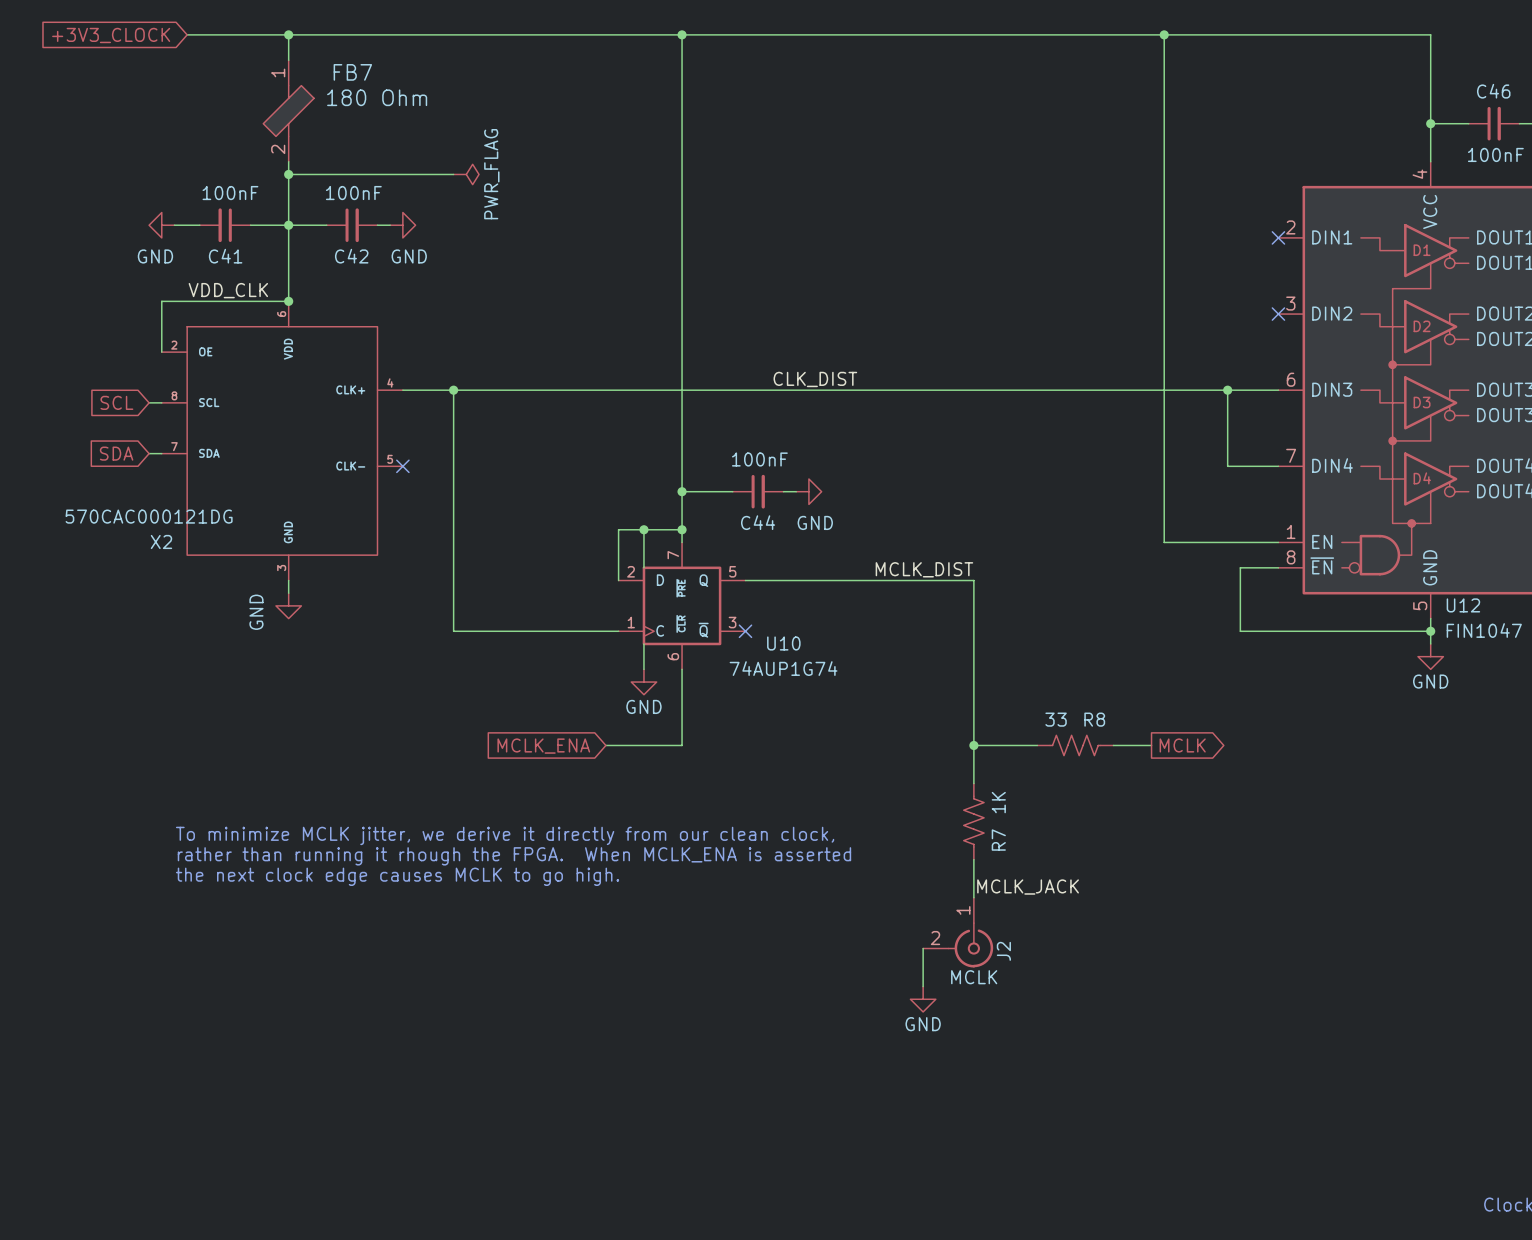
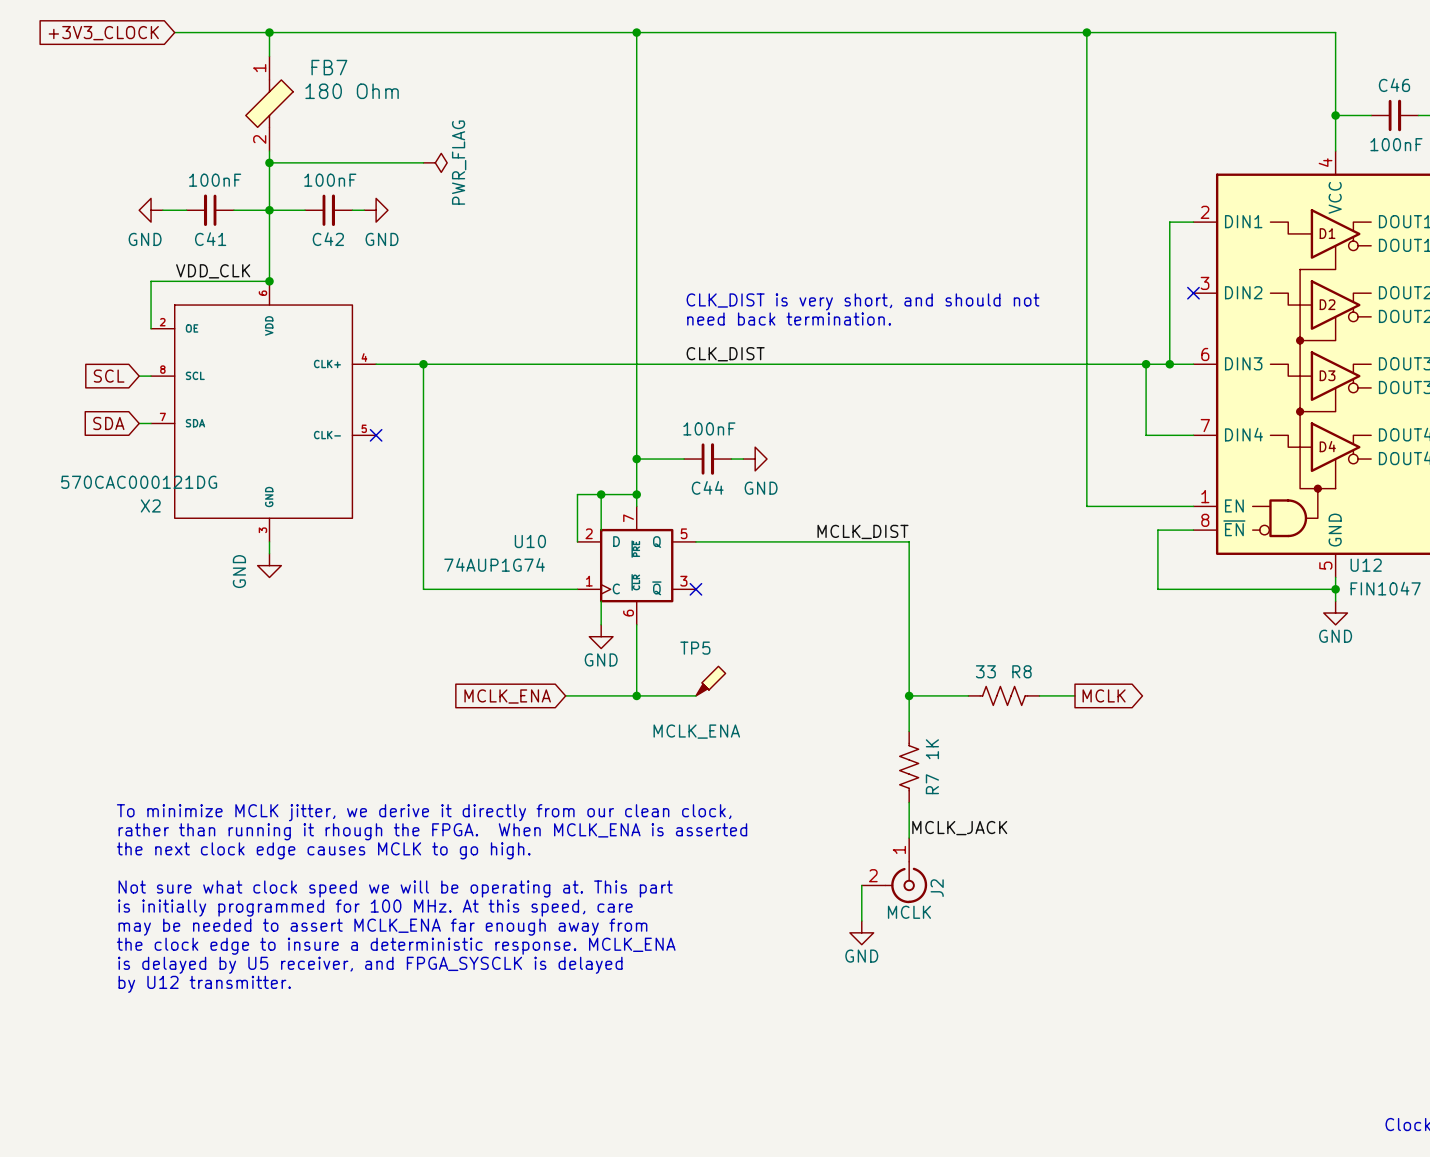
wire: none -> (1193, 222) (1169, 222) (1169, 364)
no-connect mark: (1278, 237) -> none
text: none -> CLK_DIST is very short, and should not (862, 301)
text: none -> need back termination. (789, 319)
label position: CLK_DIST (815, 379) -> CLK_DIST (725, 354)
junction: none -> (1169, 364)
U10 name position: U10 (783, 643) -> U10 (530, 541)
U10 value position: 74AUP1G74 (783, 668) -> 74AUP1G74 (494, 564)
TP5: none -> MCLK_ENA (710, 681)
wire: none -> (636, 695) (695, 695)
junction: none -> (636, 695)
text position: To minimize MCLK jitter, we derive it directly from our clean clock, (505, 835) -> To minimize MCLK jitter, we derive it directly from our clean clock, (424, 812)
text position: rather than running it rhough the FPGA. When MCLK_ENA is asserted (514, 856) -> rather than running it rhough the FPGA. When MCLK_ENA is asserted (432, 831)
text position: the next clock edge causes MCLK to go high. (397, 876) -> the next clock edge causes MCLK to go high. (323, 850)
text: none -> Not sure what clock speed we will be operating at. This part (395, 888)
text: none -> is initially programmed for 100 MHz. At this speed, care (375, 908)
text: none -> may be needed to assert MCLK_ENA far enough away from (382, 927)
text: none -> the clock edge to insure a deterministic response. MCLK_ENA (396, 946)
text: none -> is delayed by U5 receiver, and FPGA_SYSCLK is delayed (370, 965)
text: none -> by U12 transmitter. (204, 984)

